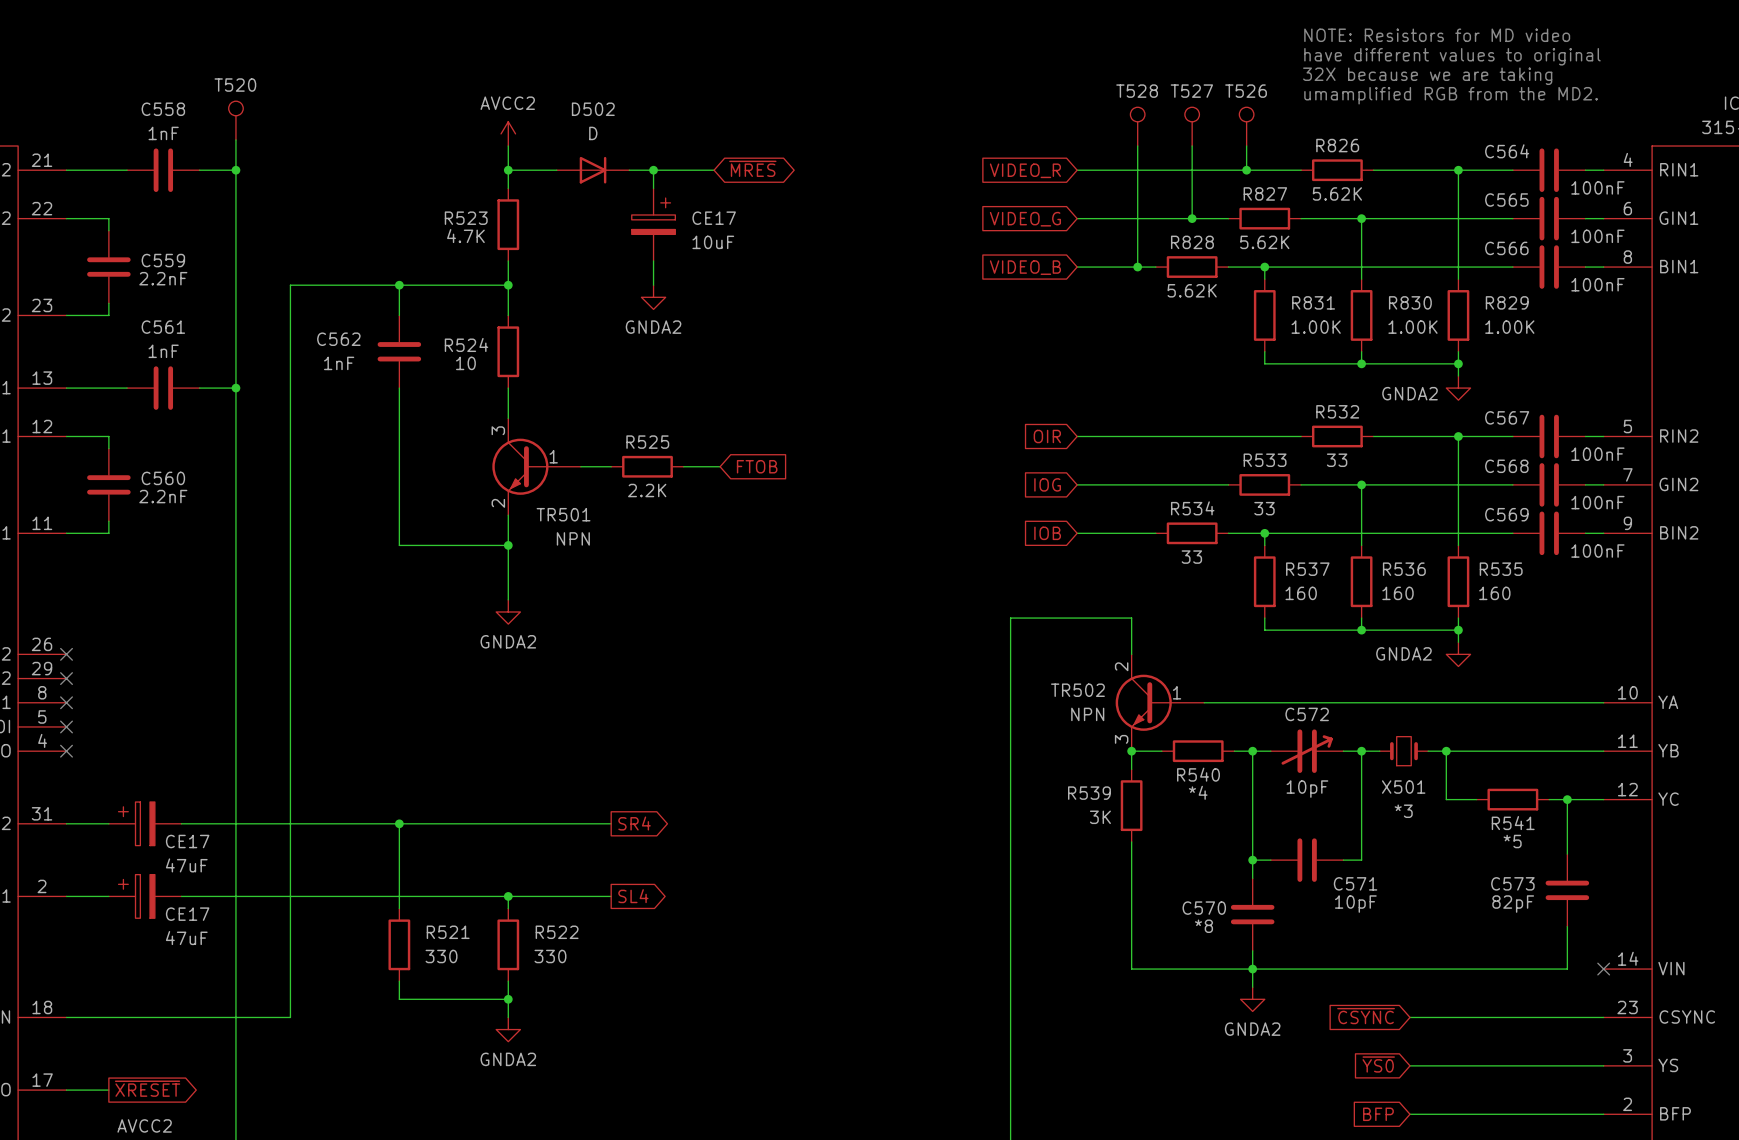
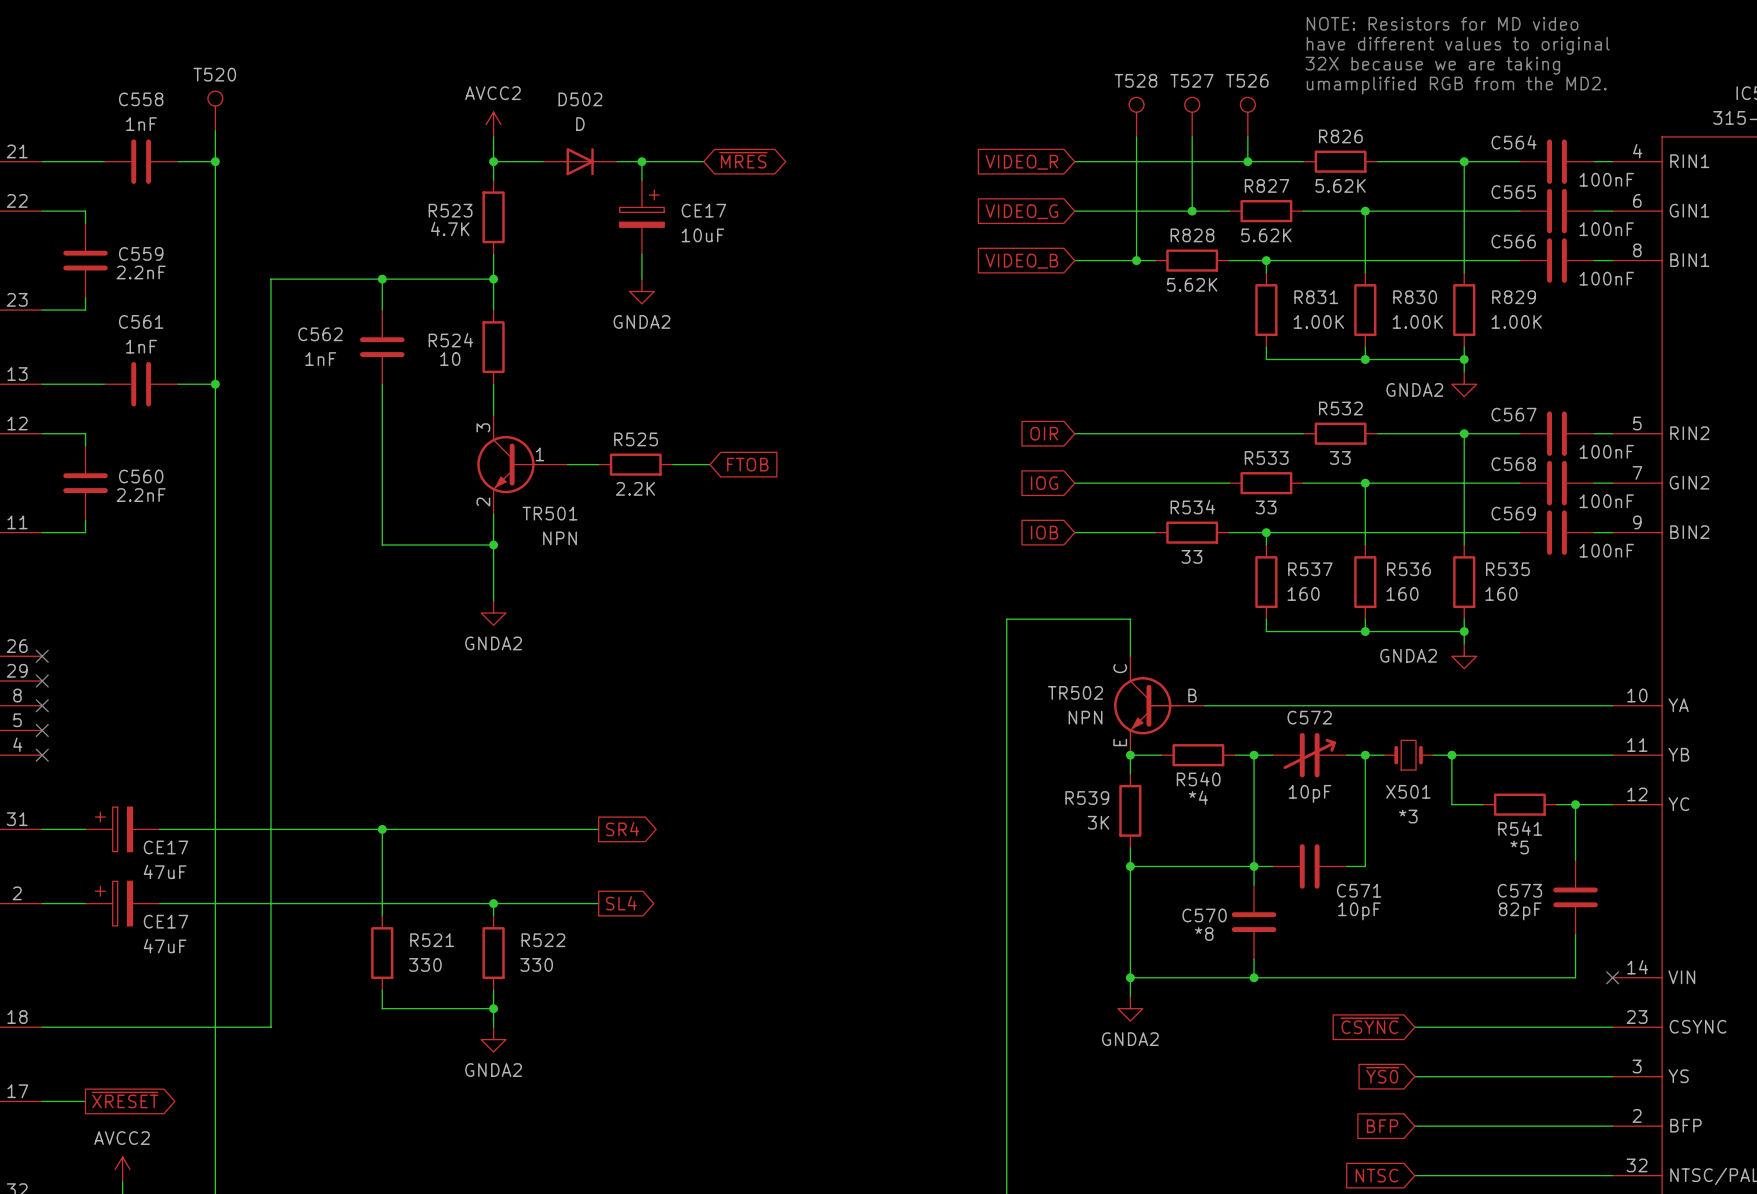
TR502 symbol: [1115, 654, 1205, 752] -> [1114, 656, 1205, 756]
wire: none -> (1130, 866) (1254, 866)
junction: none -> (1130, 866)
junction: none -> (1130, 977)
wire: (1252, 969) (1252, 987) -> (1130, 977) (1130, 996)
power symbol position: GNDA2 (1252, 999) -> GNDA2 (1130, 1008)

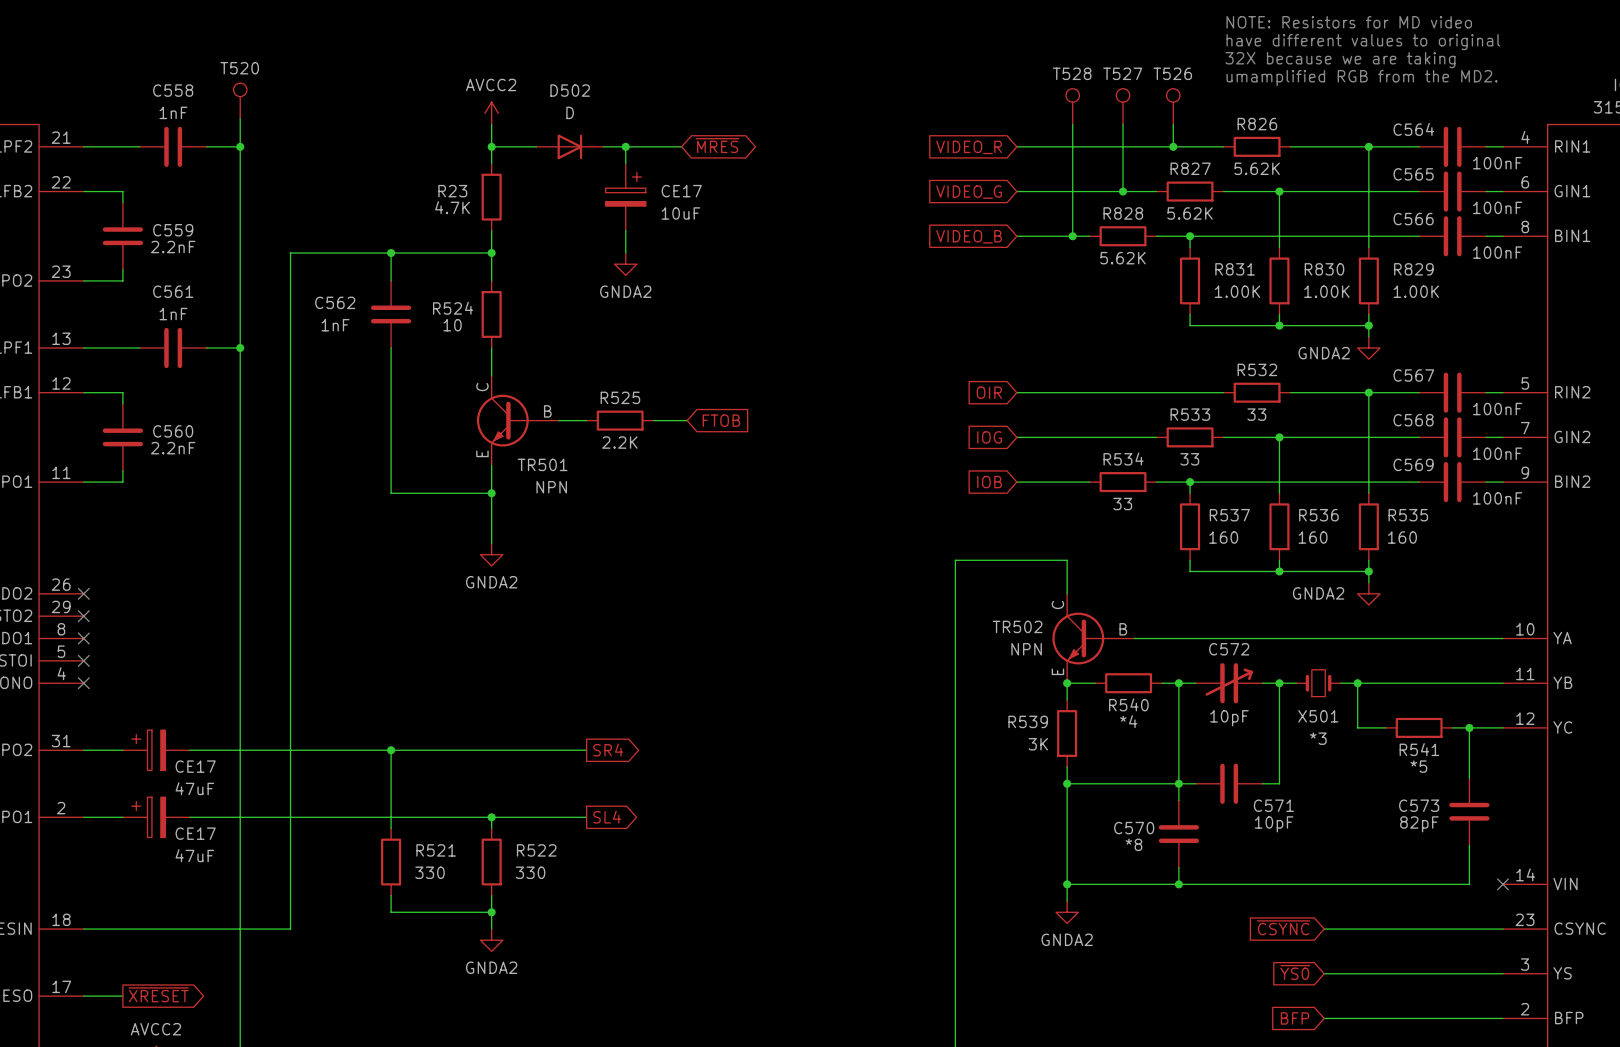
R523 name: R523 (450, 210) -> R23 (452, 191)
TR501 symbol: [477, 415, 568, 515] -> [476, 375, 559, 466]

